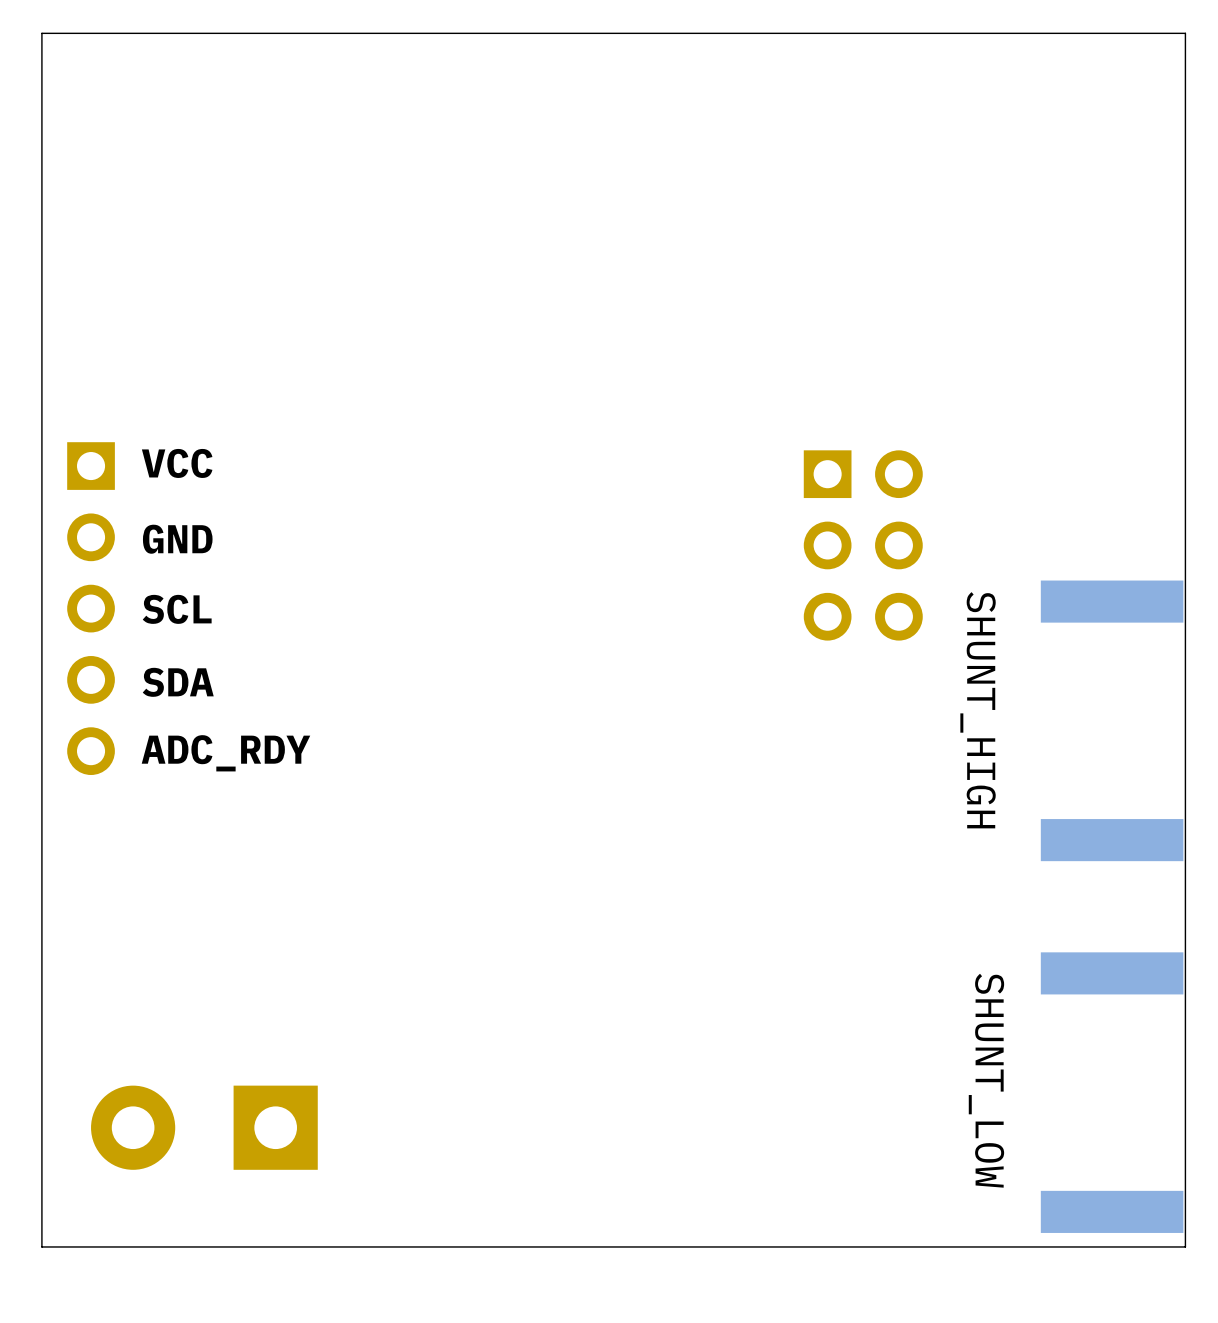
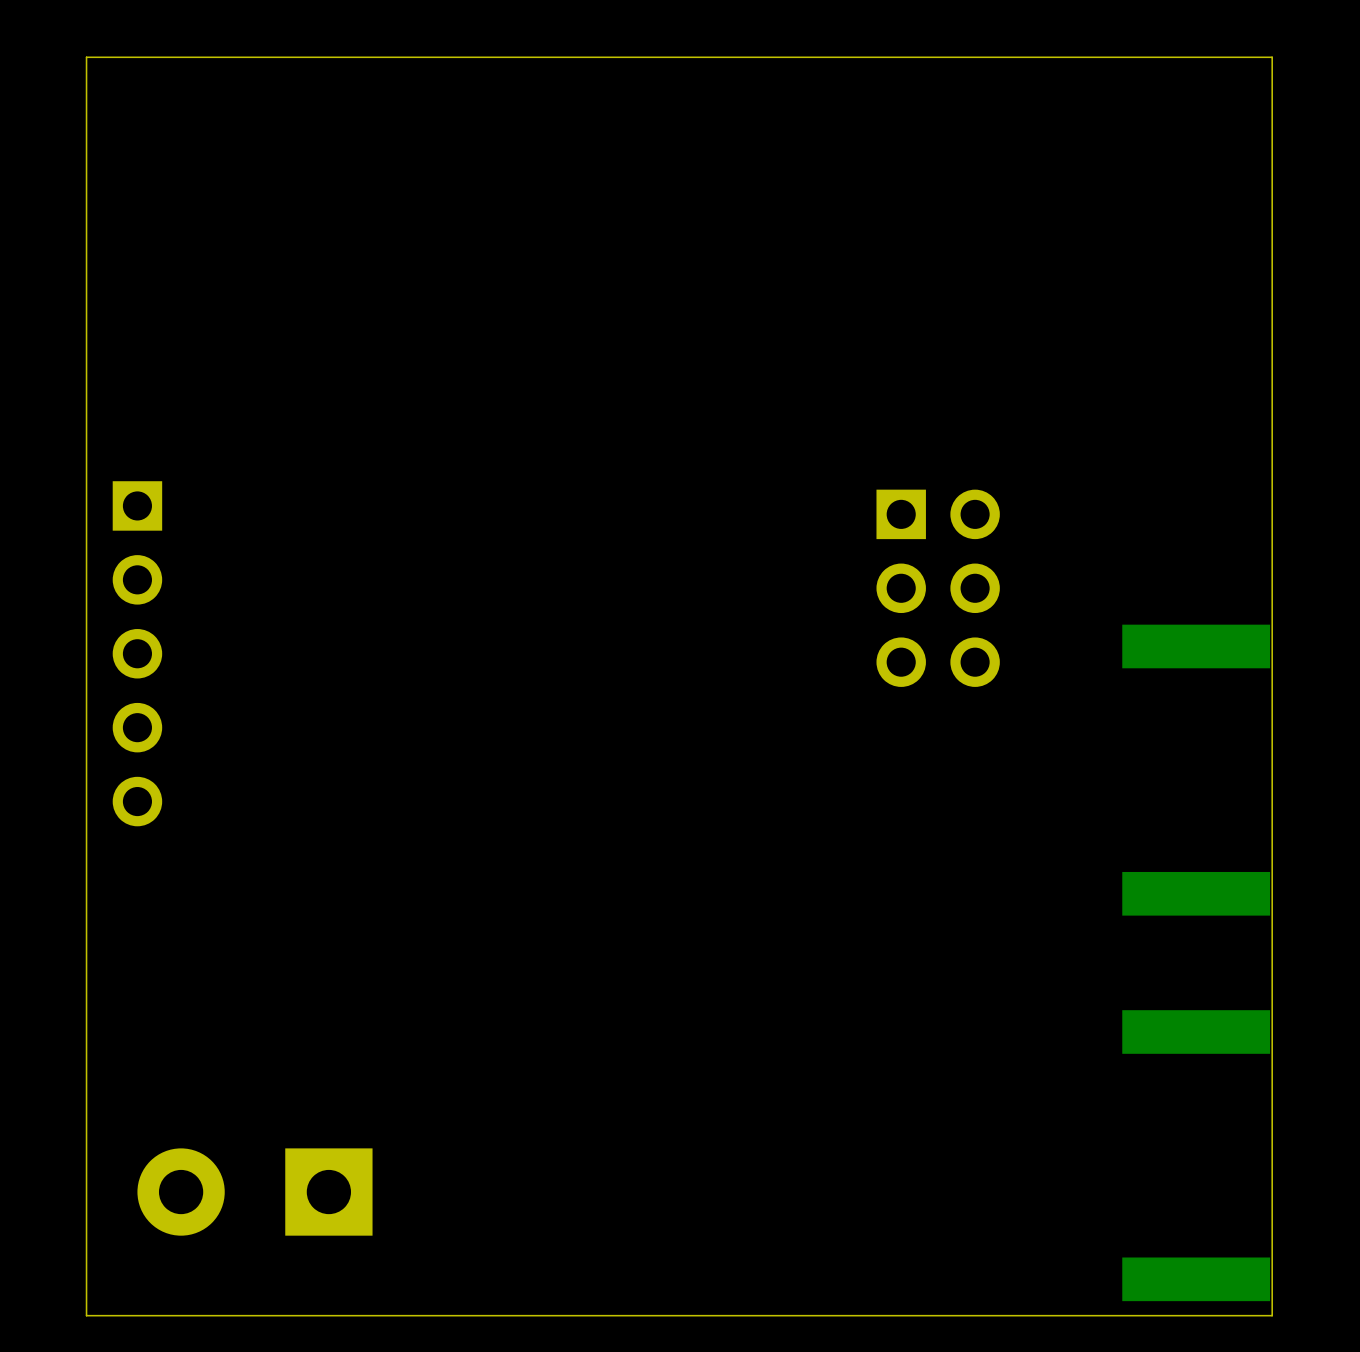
text: VCC (177, 463) -> none
text: GND (177, 539) -> none
text: SCL (177, 609) -> none
text: SDA (178, 682) -> none
text: SHUNT_HIGH (978, 710) -> none
text: ADC_RDY (225, 753) -> none
text: SHUNT_LOW (986, 1080) -> none

